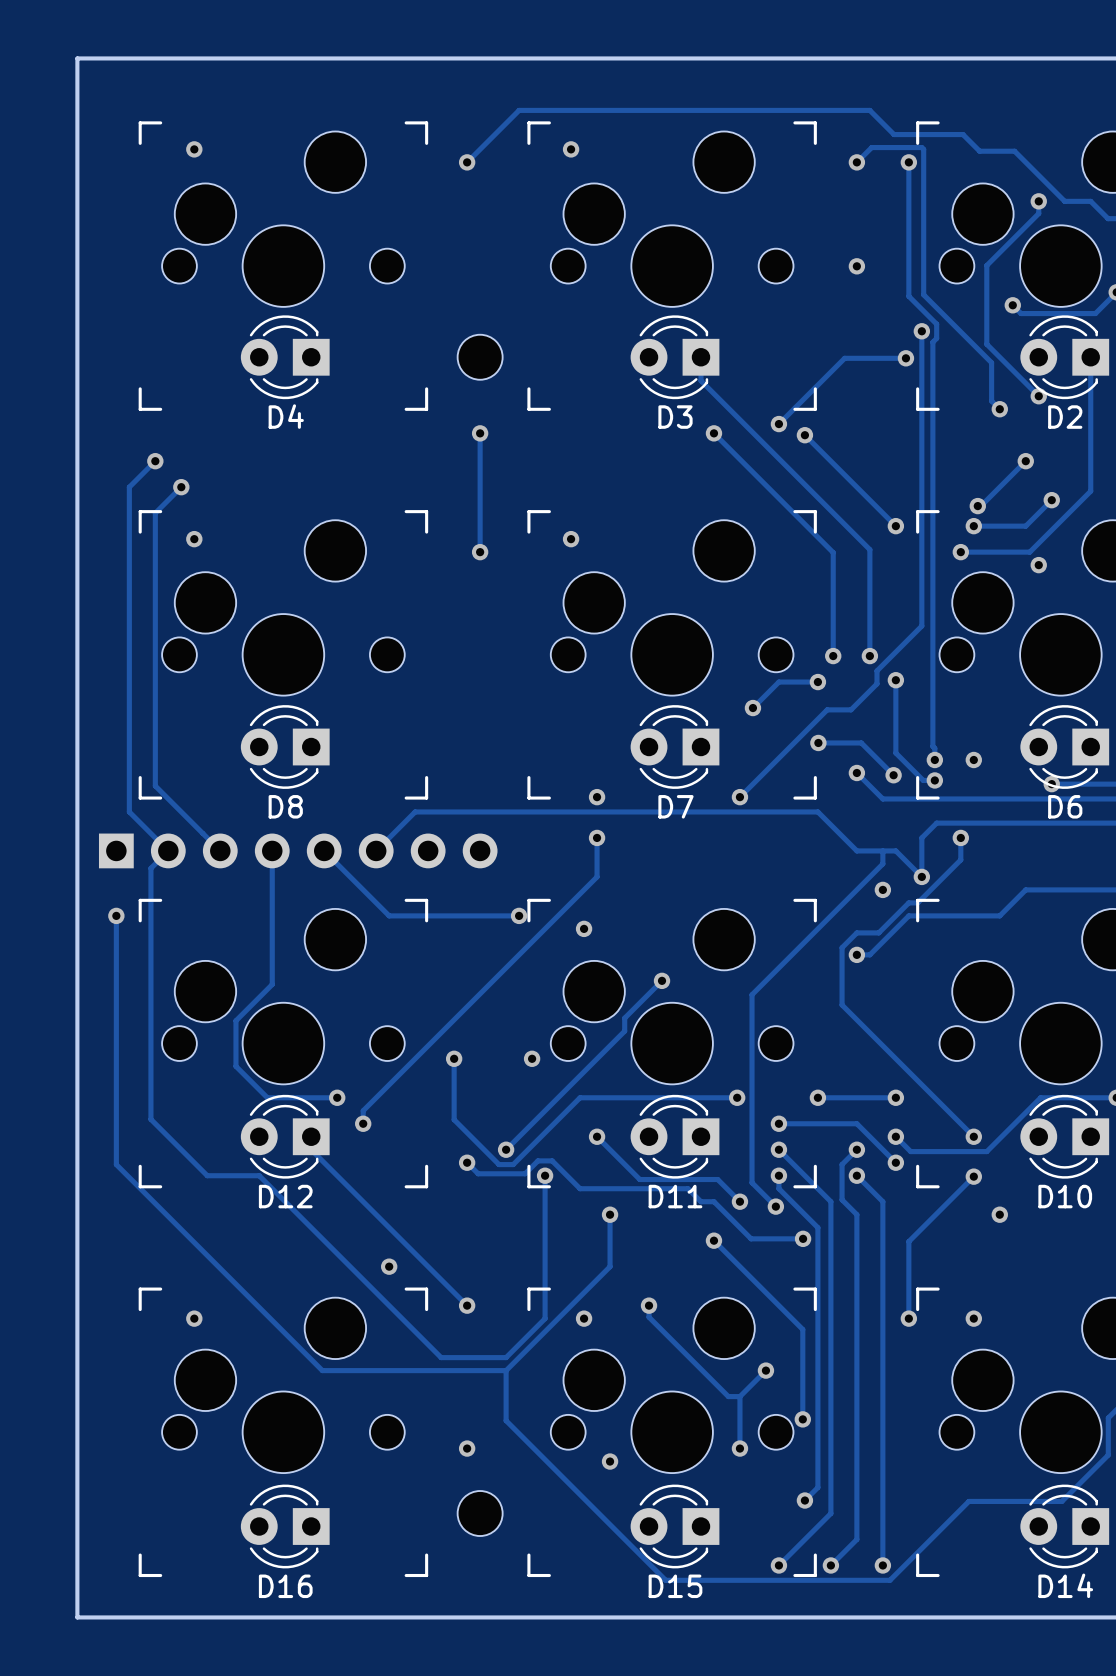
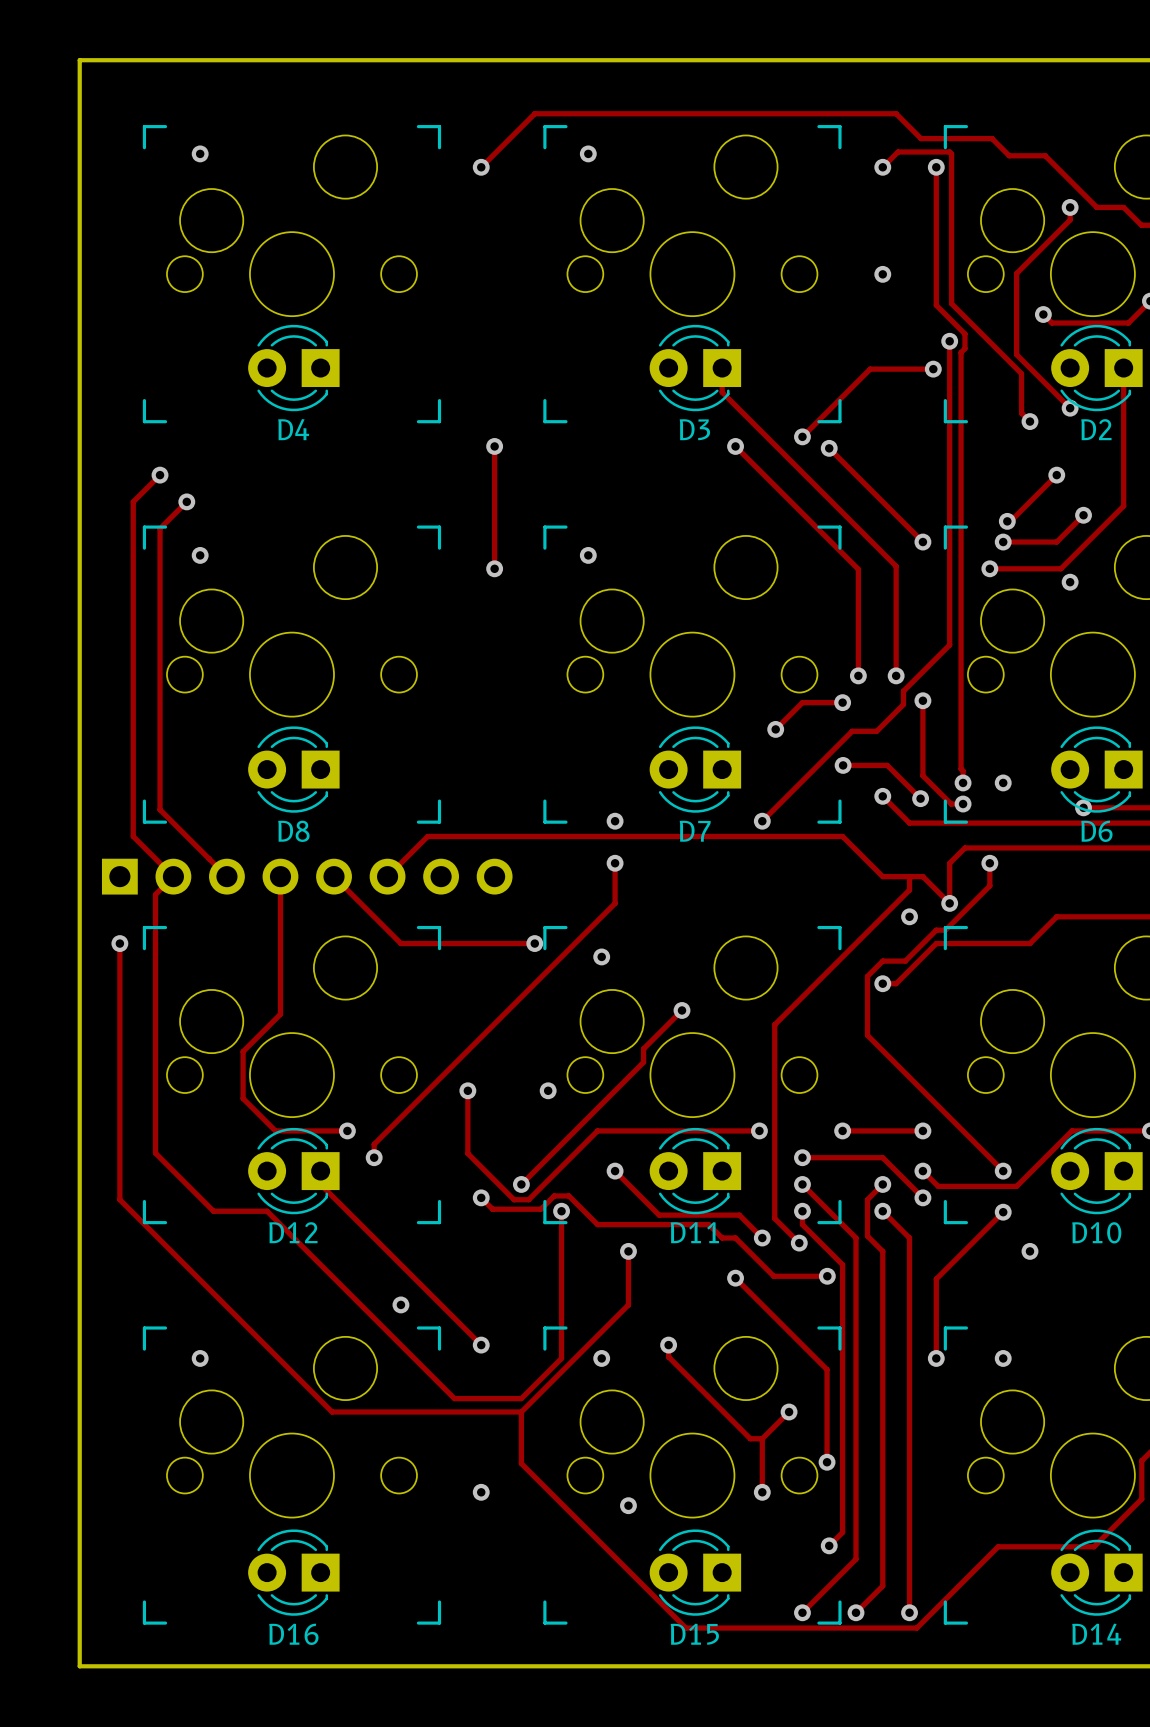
part: (480, 357) -> none
part: (480, 1513) -> none

